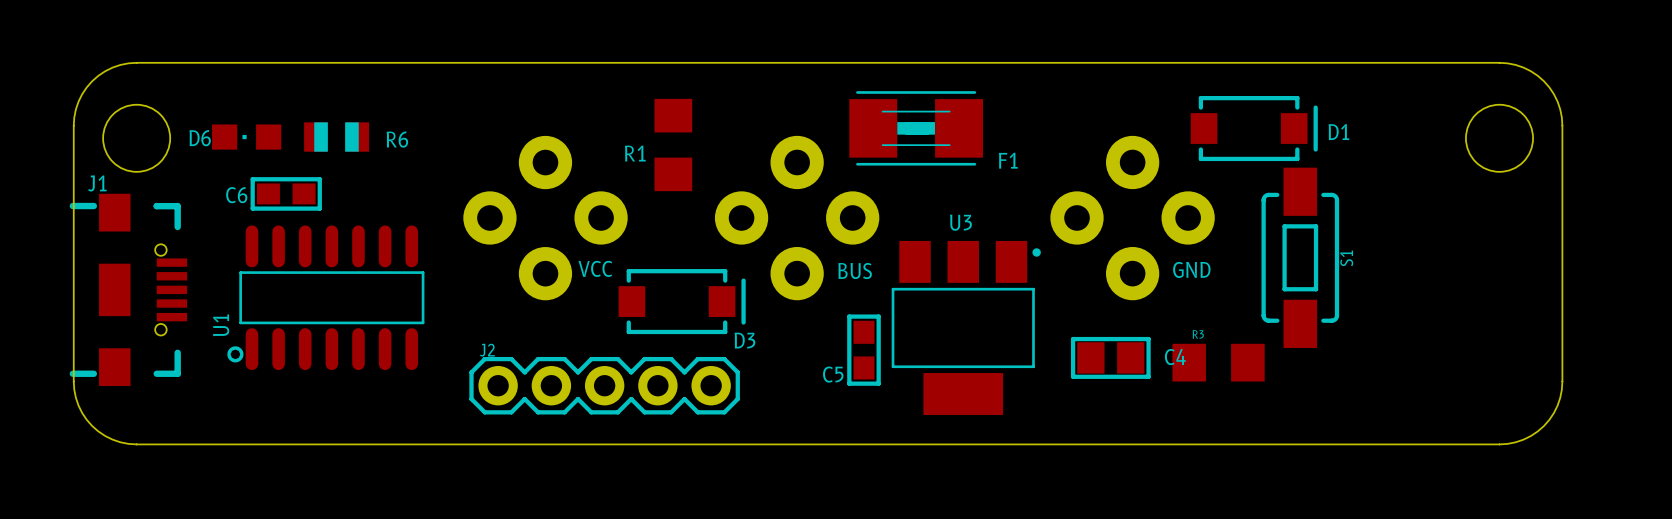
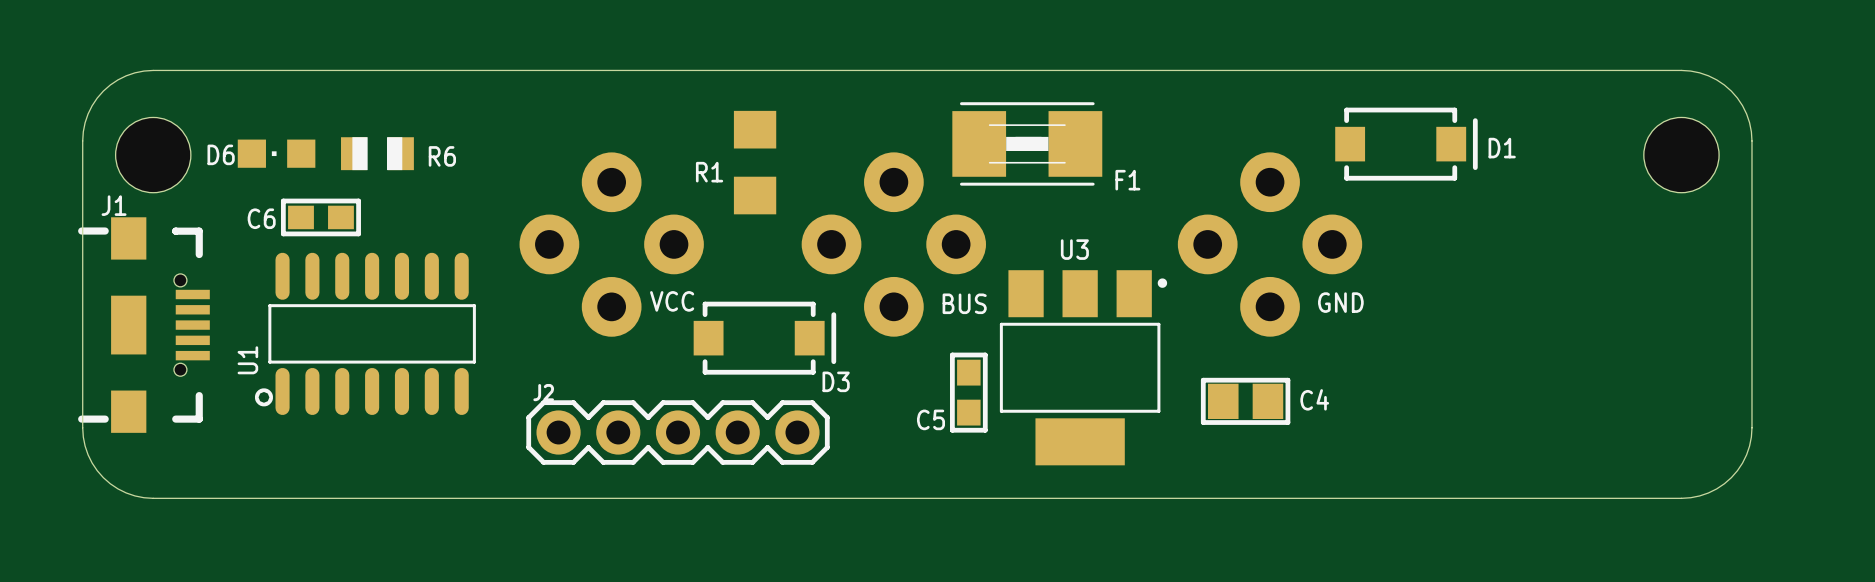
S1: (1300, 257) -> none
R3: (1218, 362) -> none

